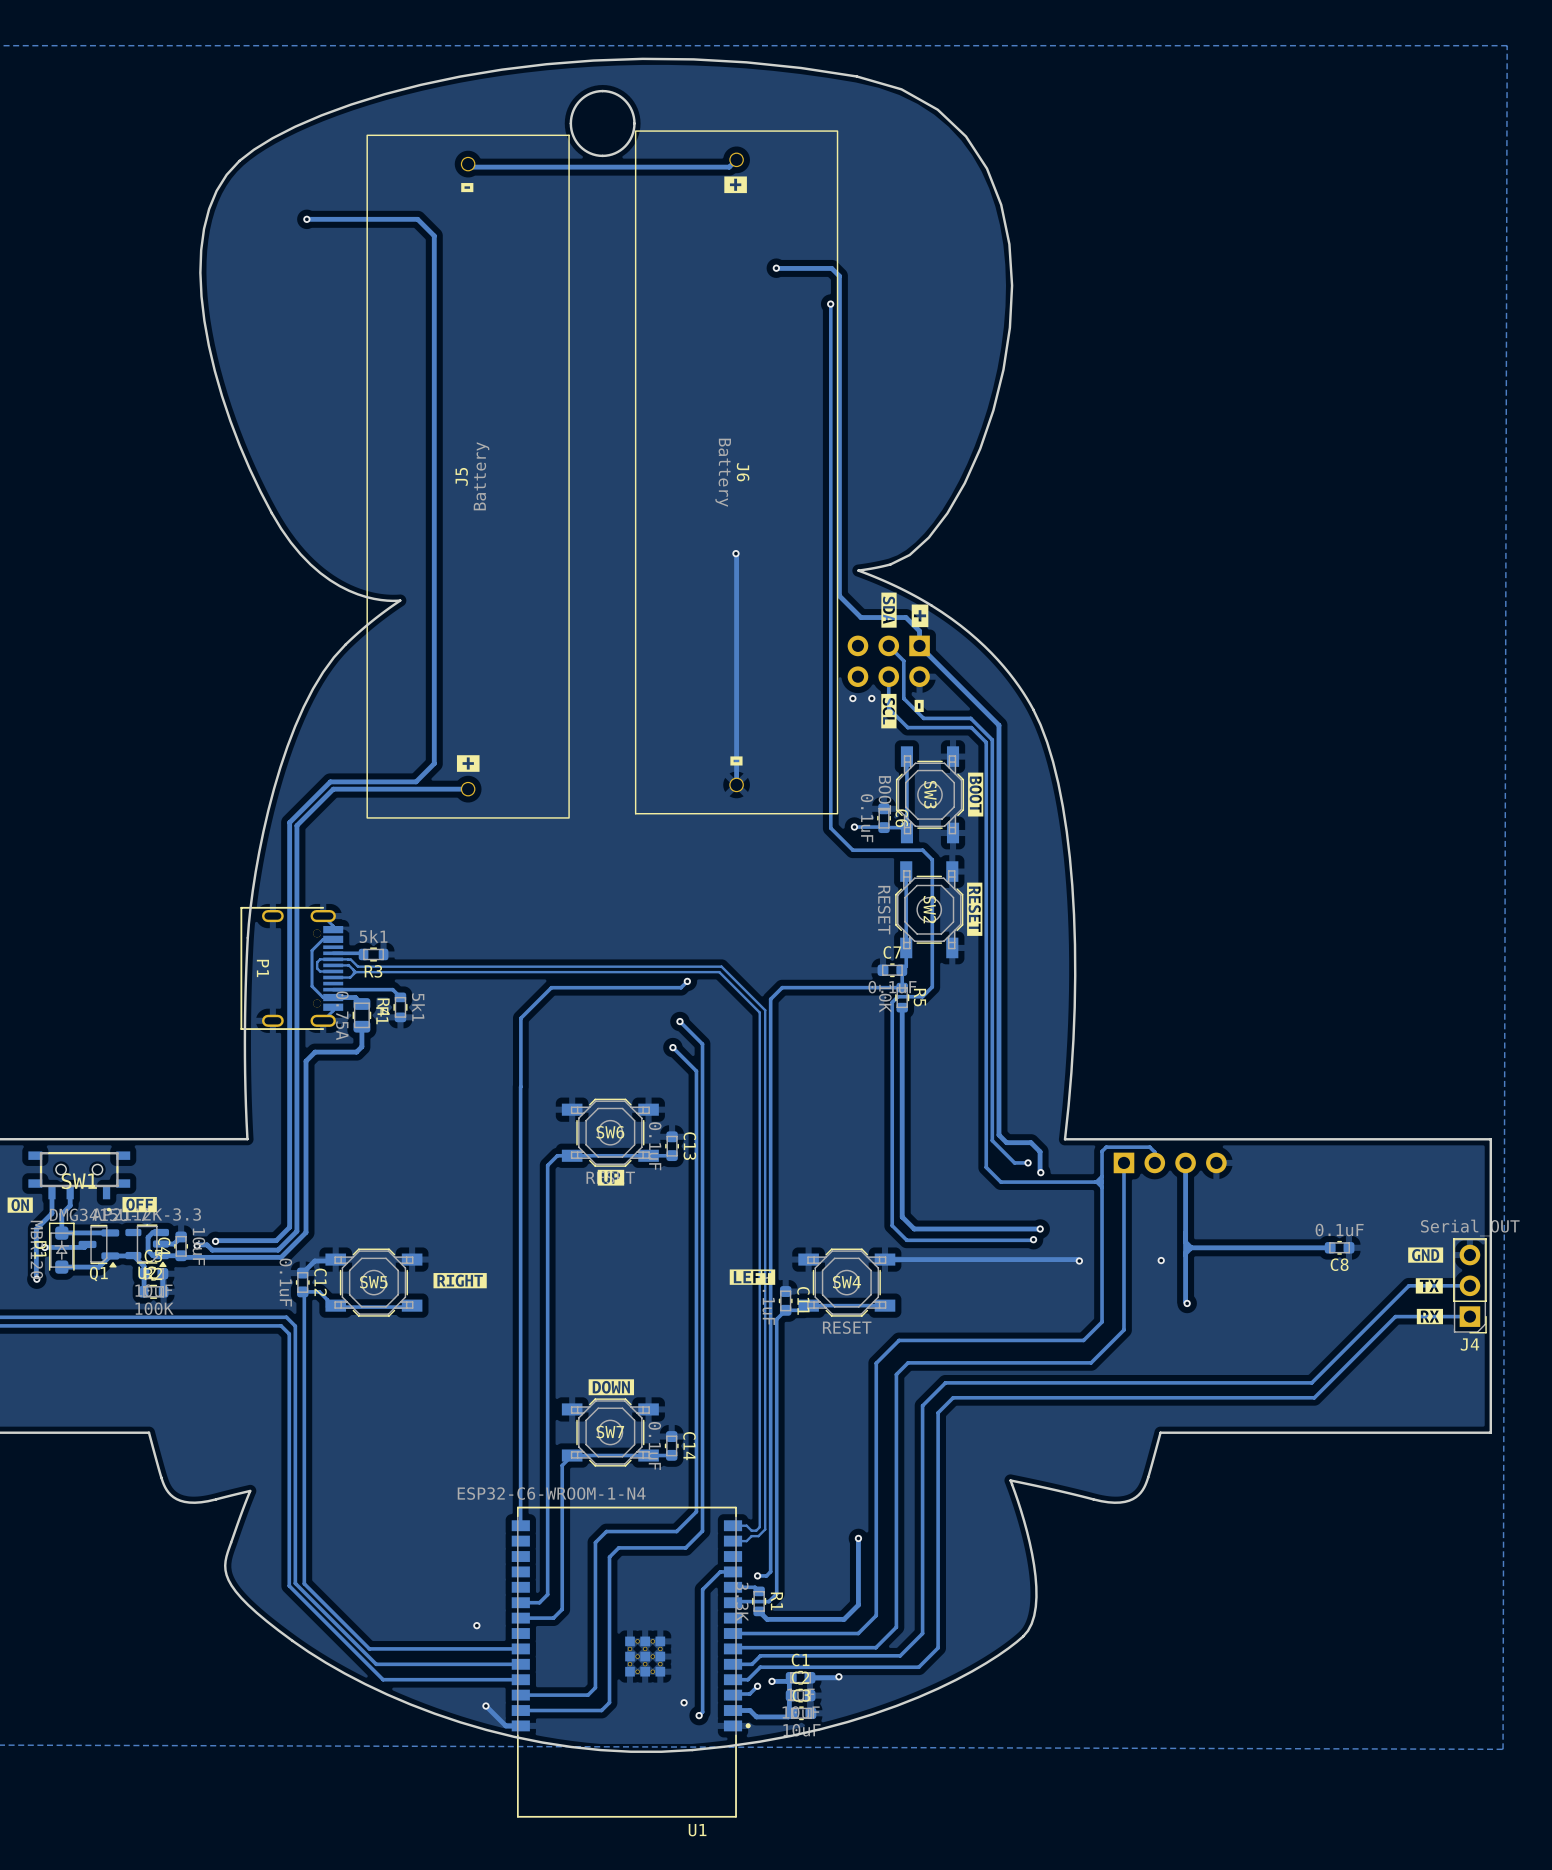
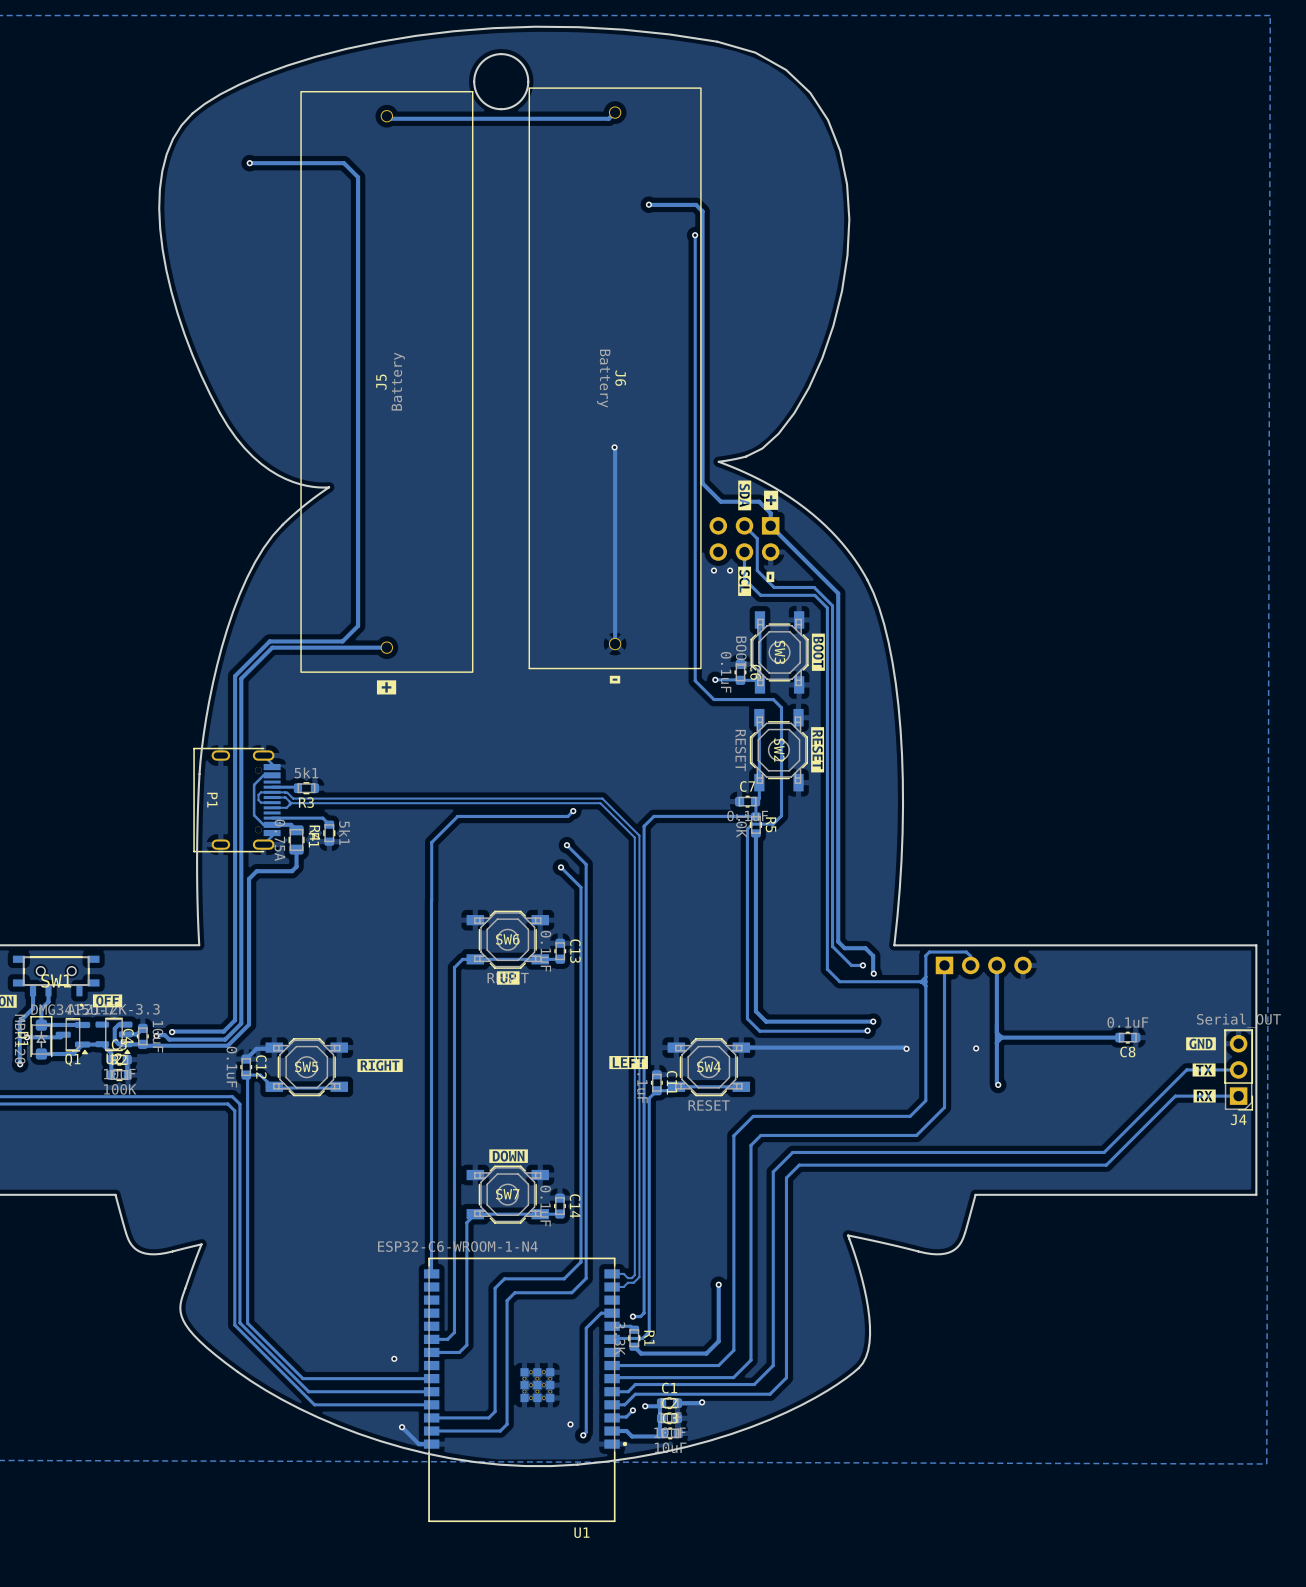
drawing: [724, 176, 747, 194] -> none
drawing: [461, 183, 474, 193] -> none
drawing position: (736, 760) -> (615, 679)
drawing position: (468, 763) -> (386, 687)

